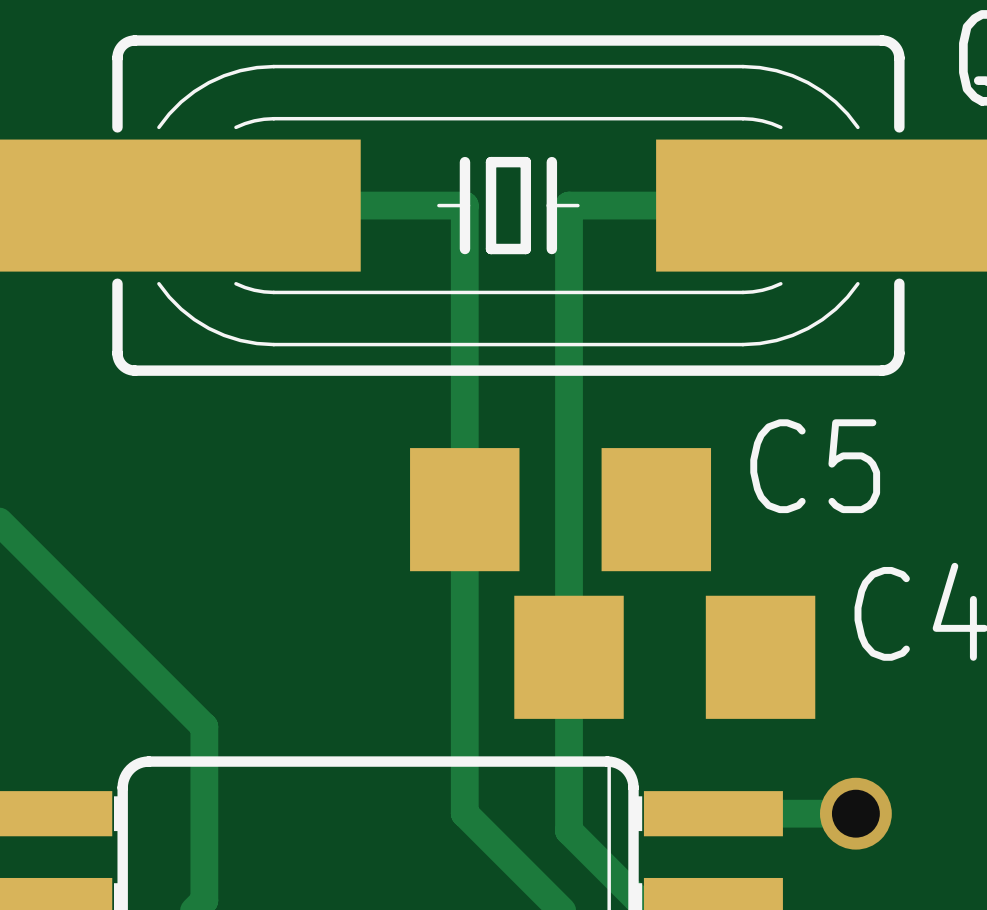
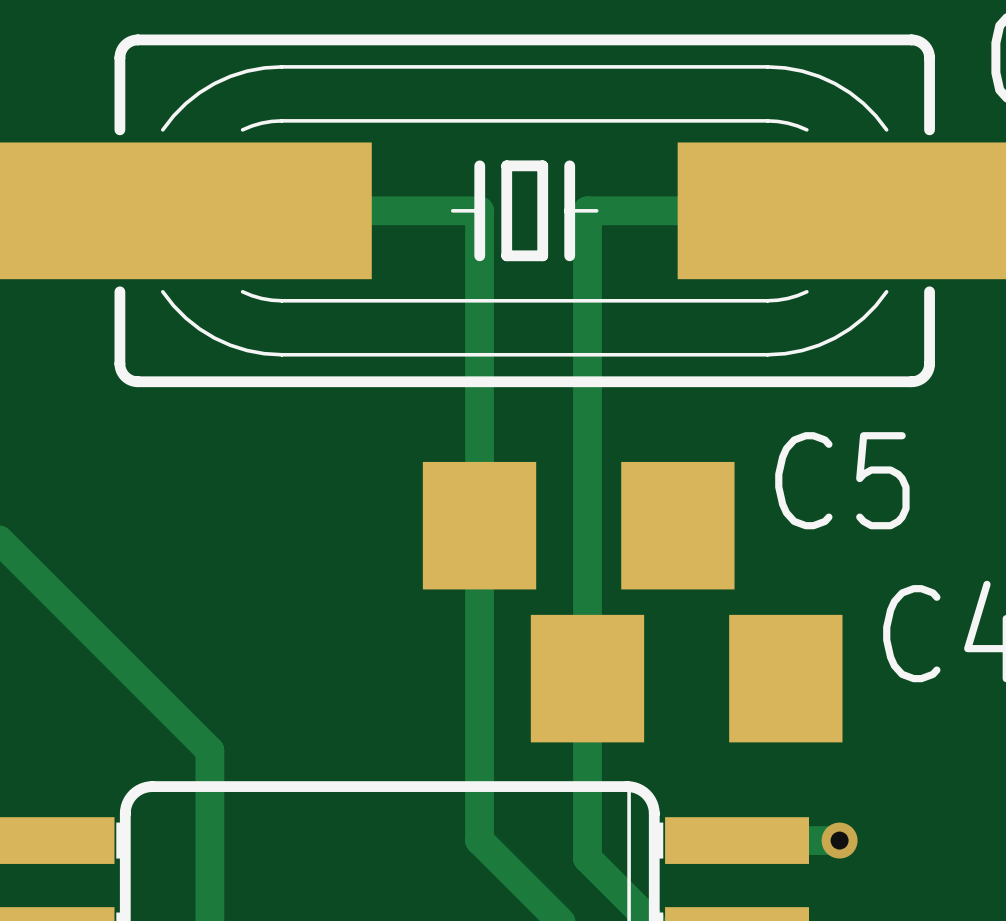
via size: [819, 777, 892, 850] -> [821, 822, 858, 859]

